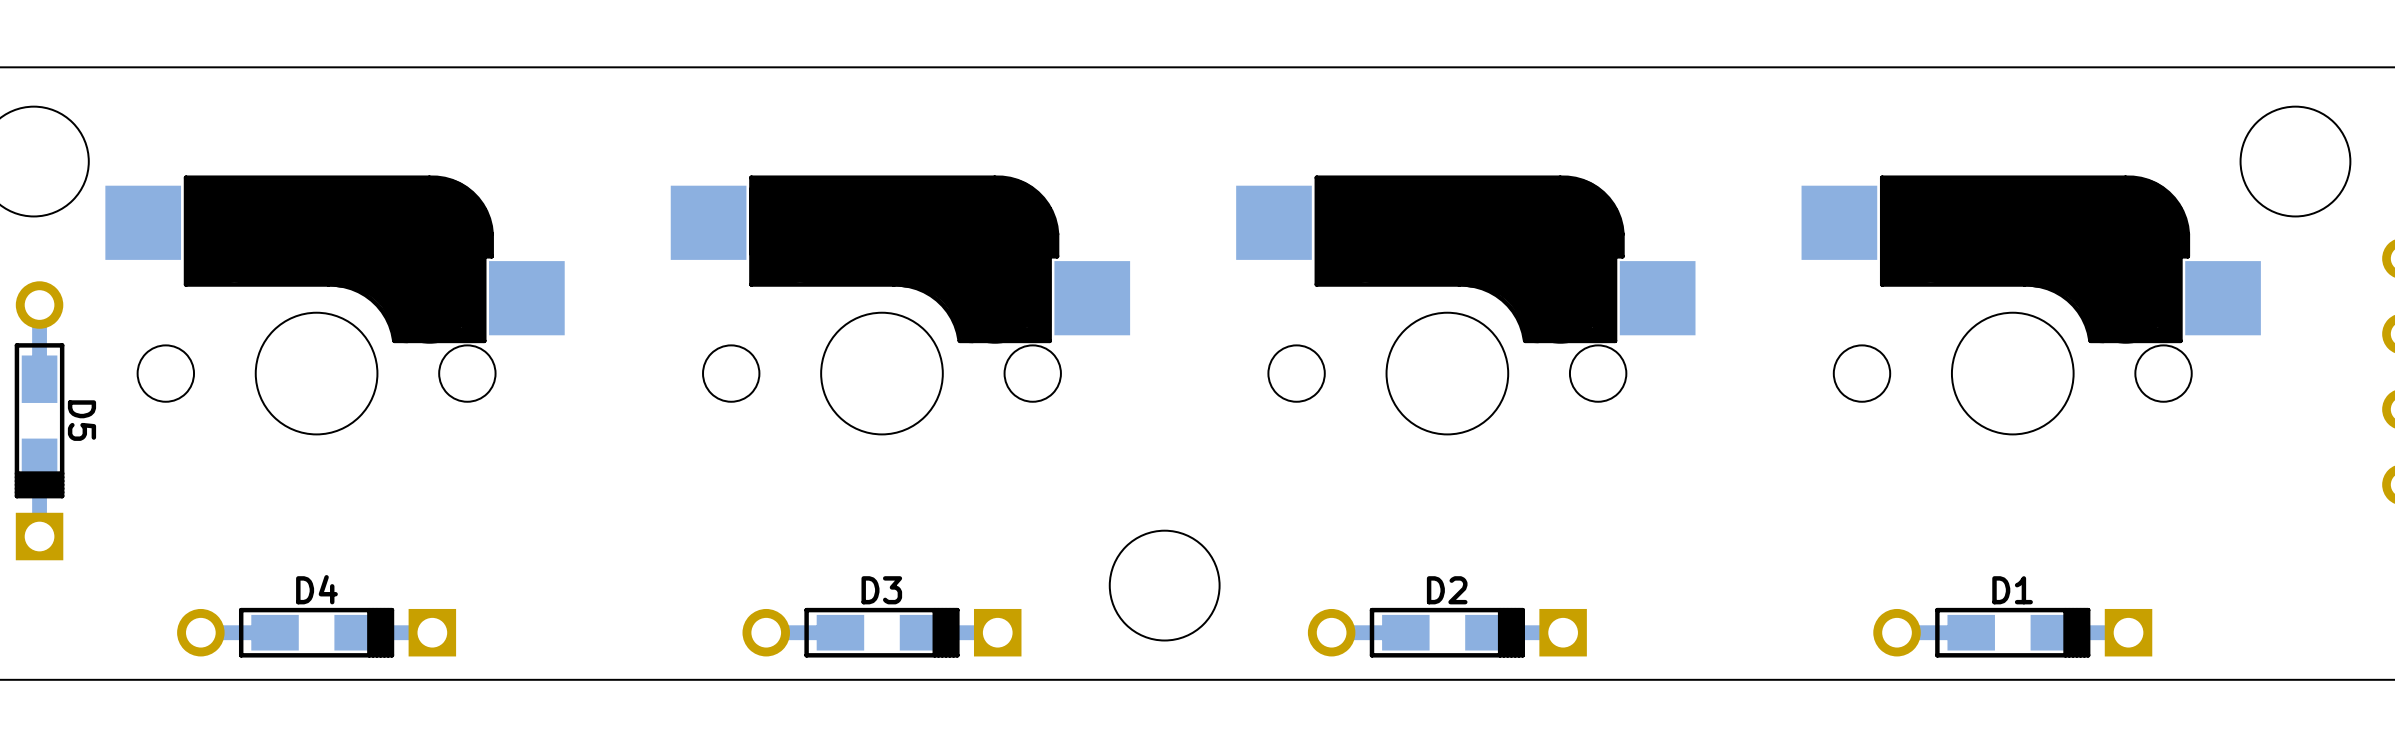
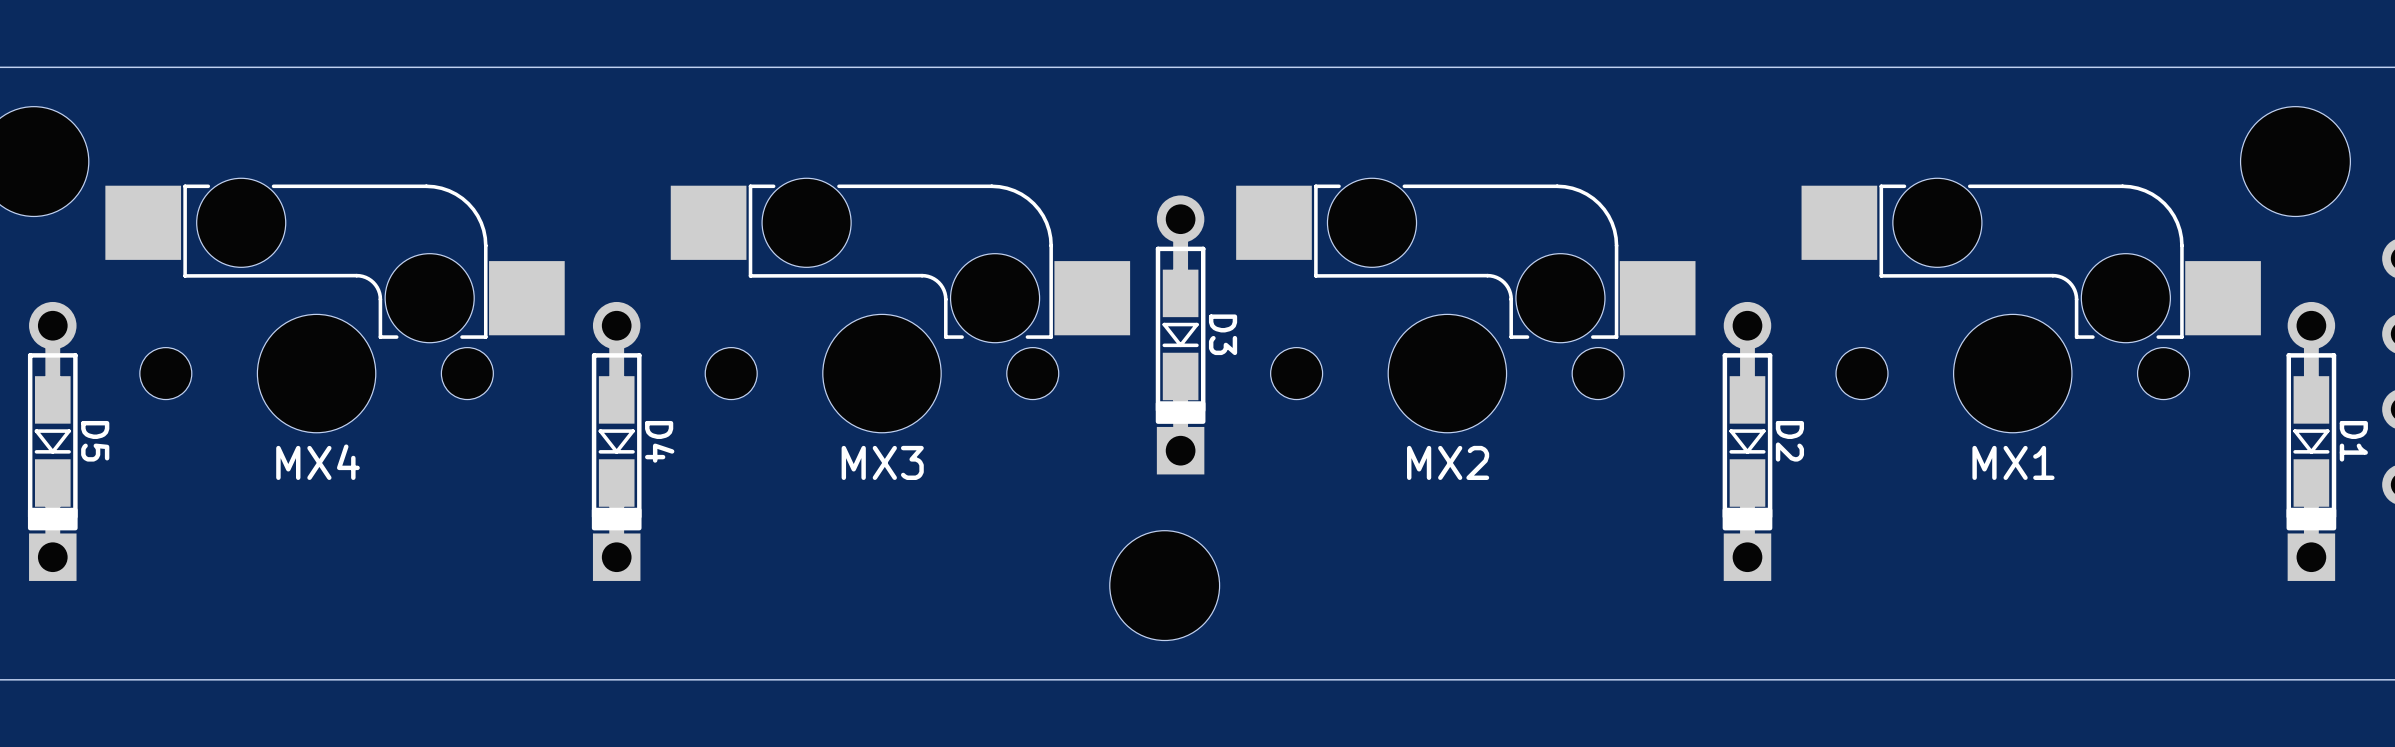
D5 footprint: [14, 281, 65, 561] -> [27, 301, 78, 581]
part: (335, 304) -> none
part: (900, 304) -> none
part: (1465, 304) -> none
part: (2031, 304) -> none
MX4: none -> (335, 305)
MX3: none -> (900, 305)
MX2: none -> (1465, 305)
MX1: none -> (2031, 305)
D4 footprint: [177, 607, 457, 658] -> [591, 301, 642, 581]
D3 footprint: [742, 607, 1022, 658] -> [1155, 195, 1206, 475]
D2 footprint: [1307, 607, 1587, 658] -> [1722, 301, 1773, 581]
D1 footprint: [1873, 607, 2153, 658] -> [2286, 301, 2337, 581]

